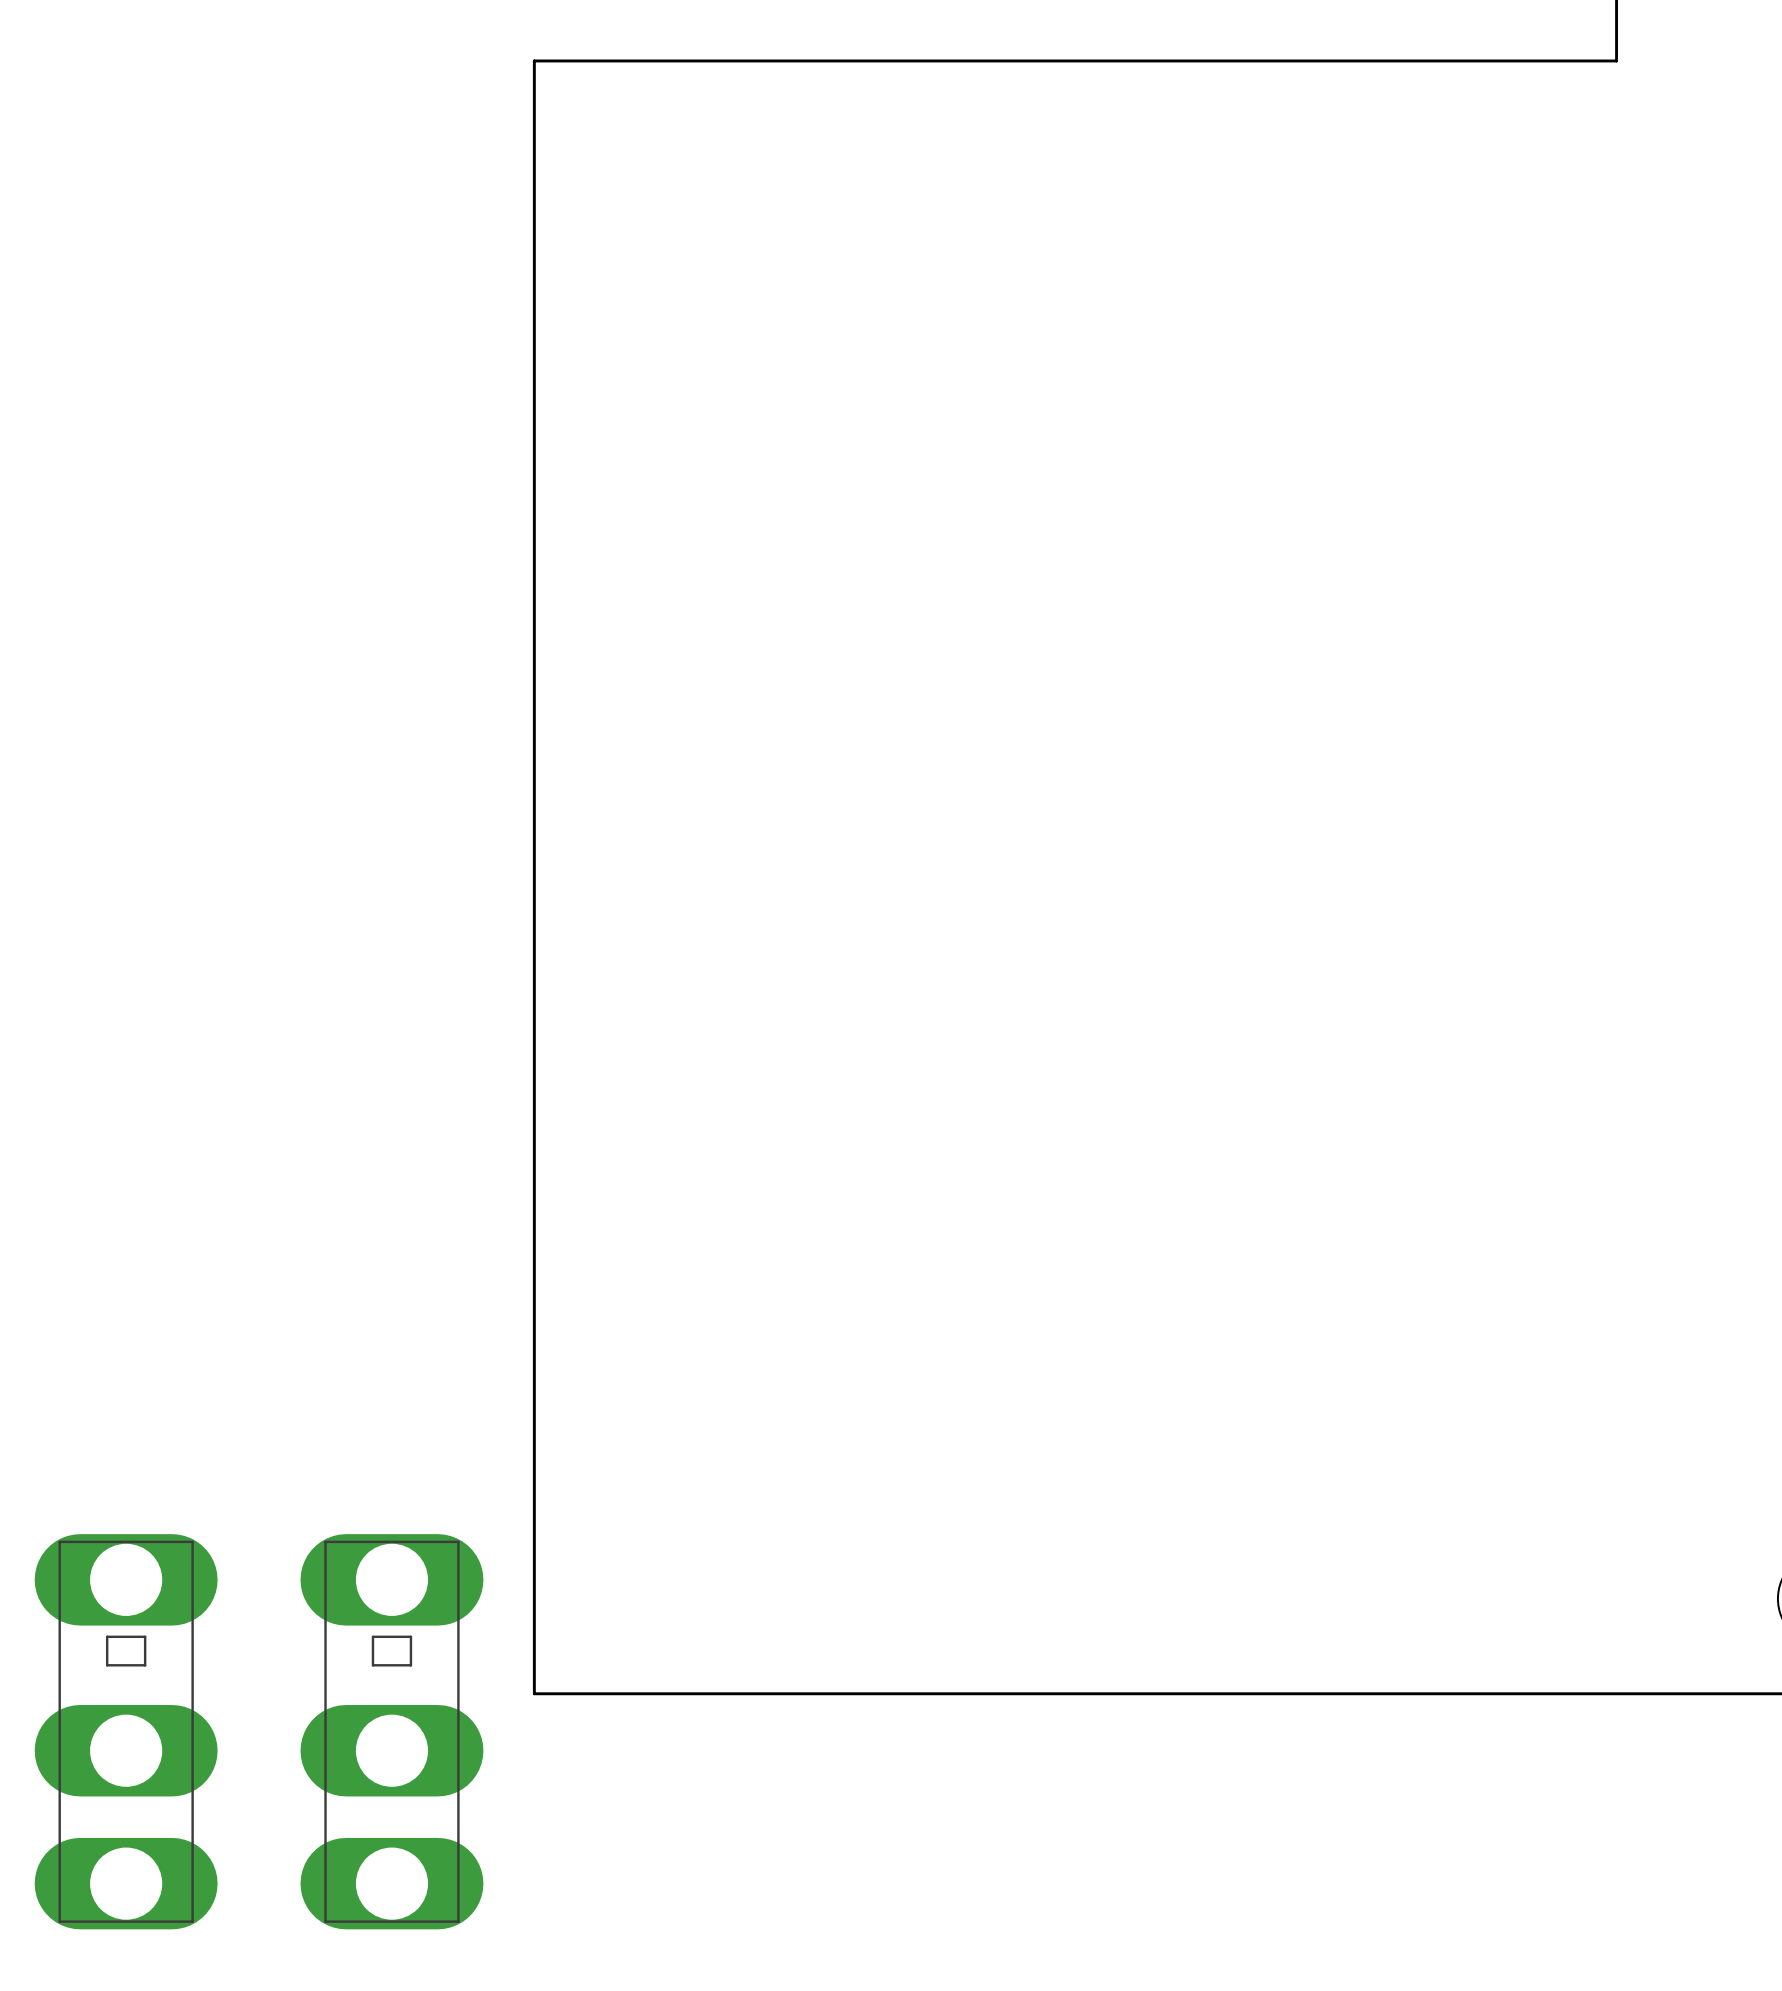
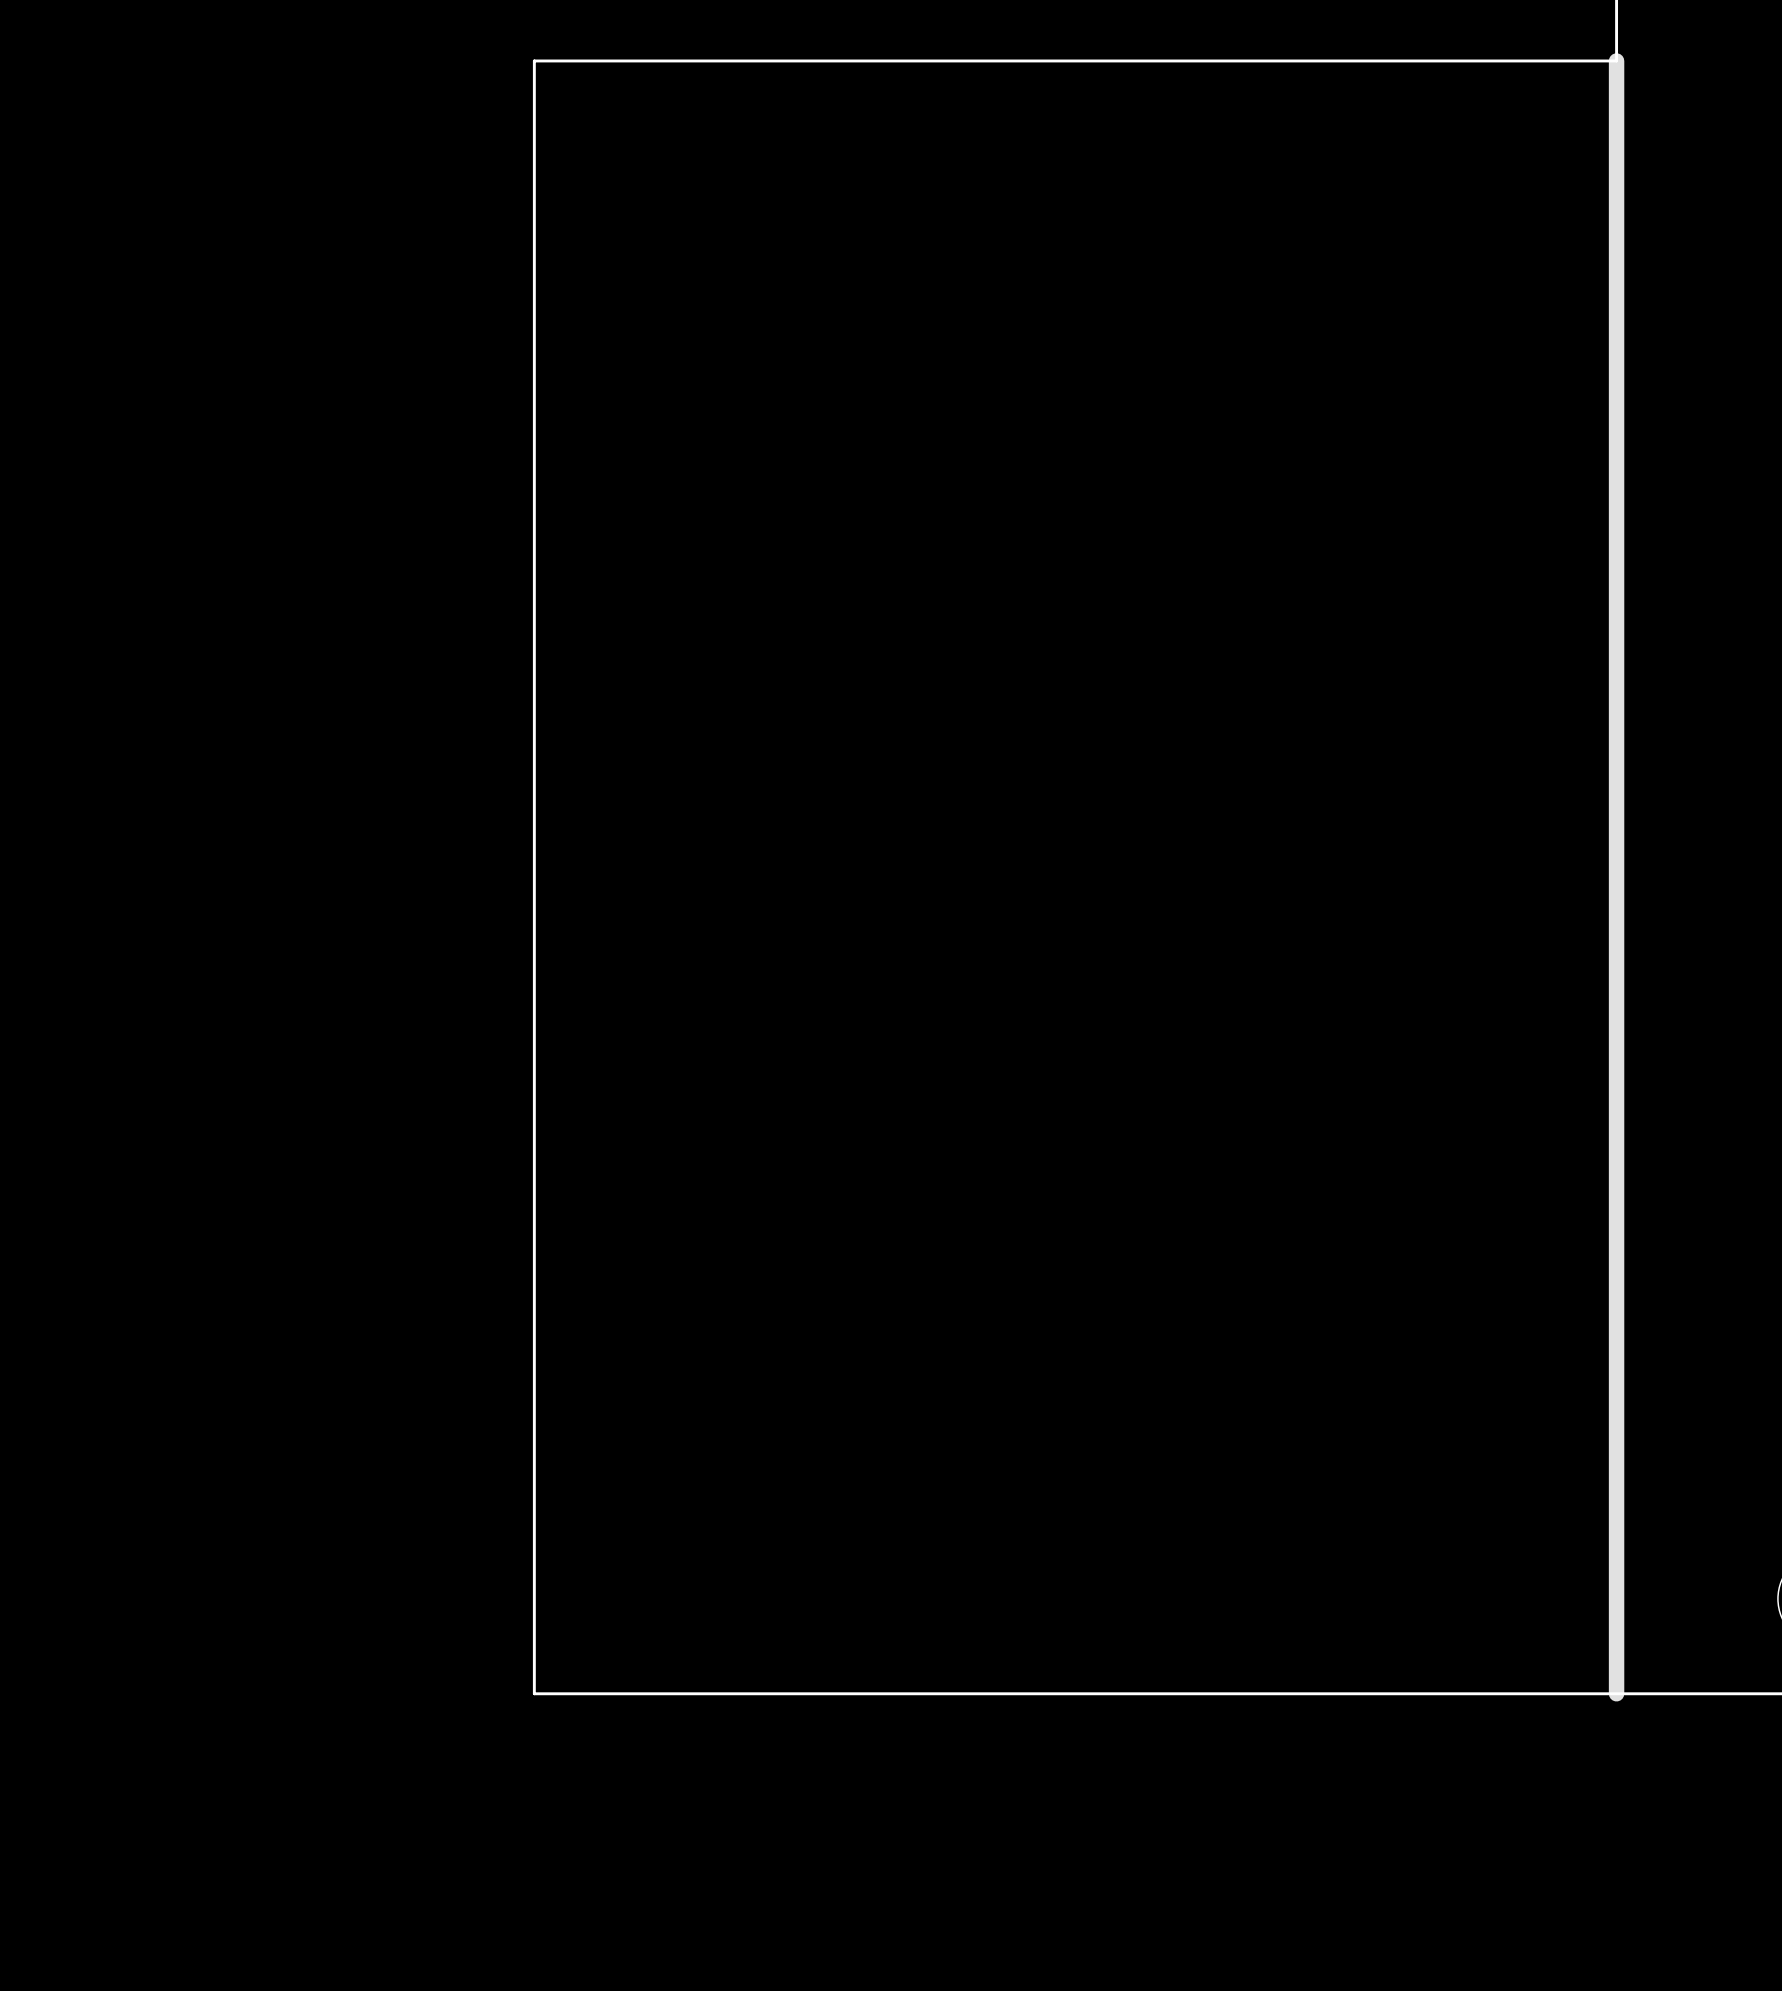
line: none -> (1616, 60) (1616, 1693)
part: (126, 1731) -> none
part: (391, 1731) -> none

